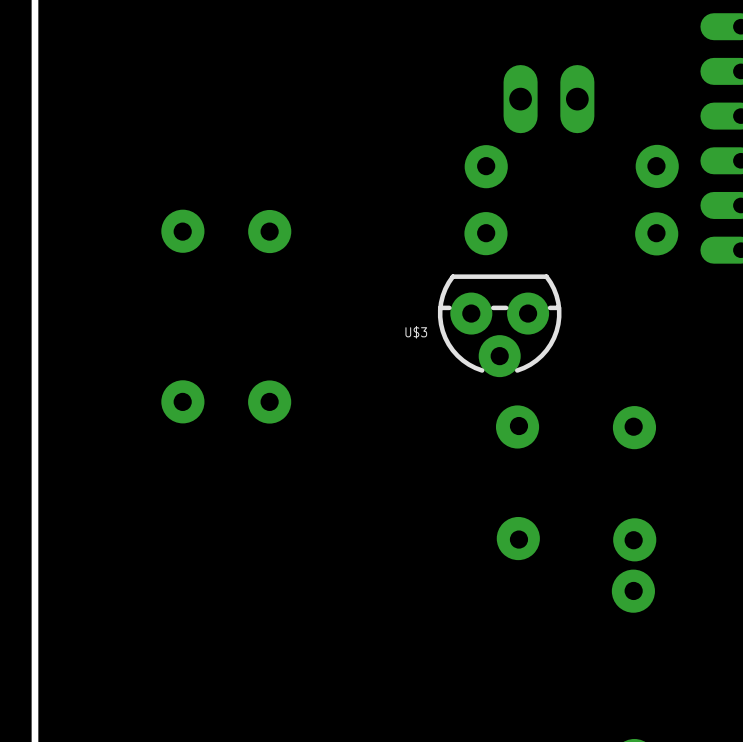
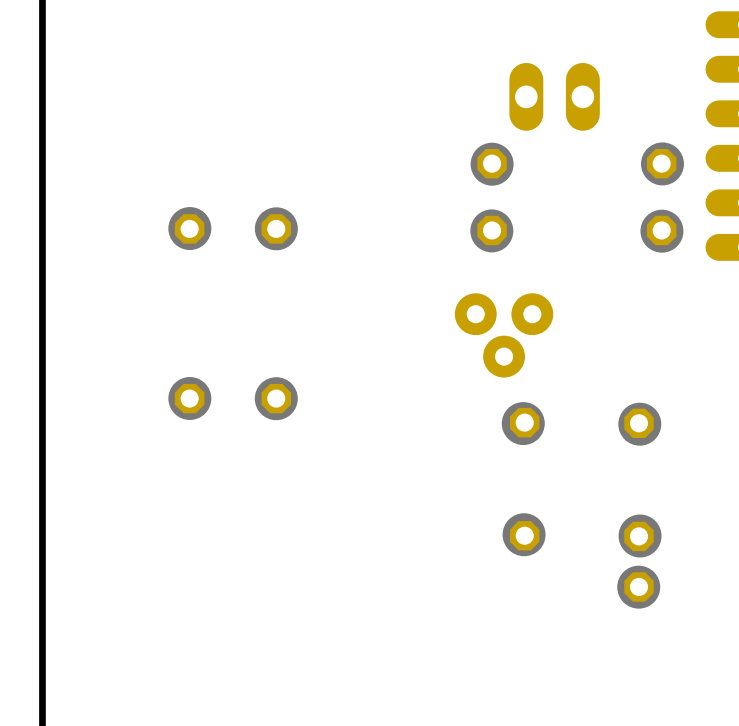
U$3 side: bottom (499, 325) -> top (504, 335)

